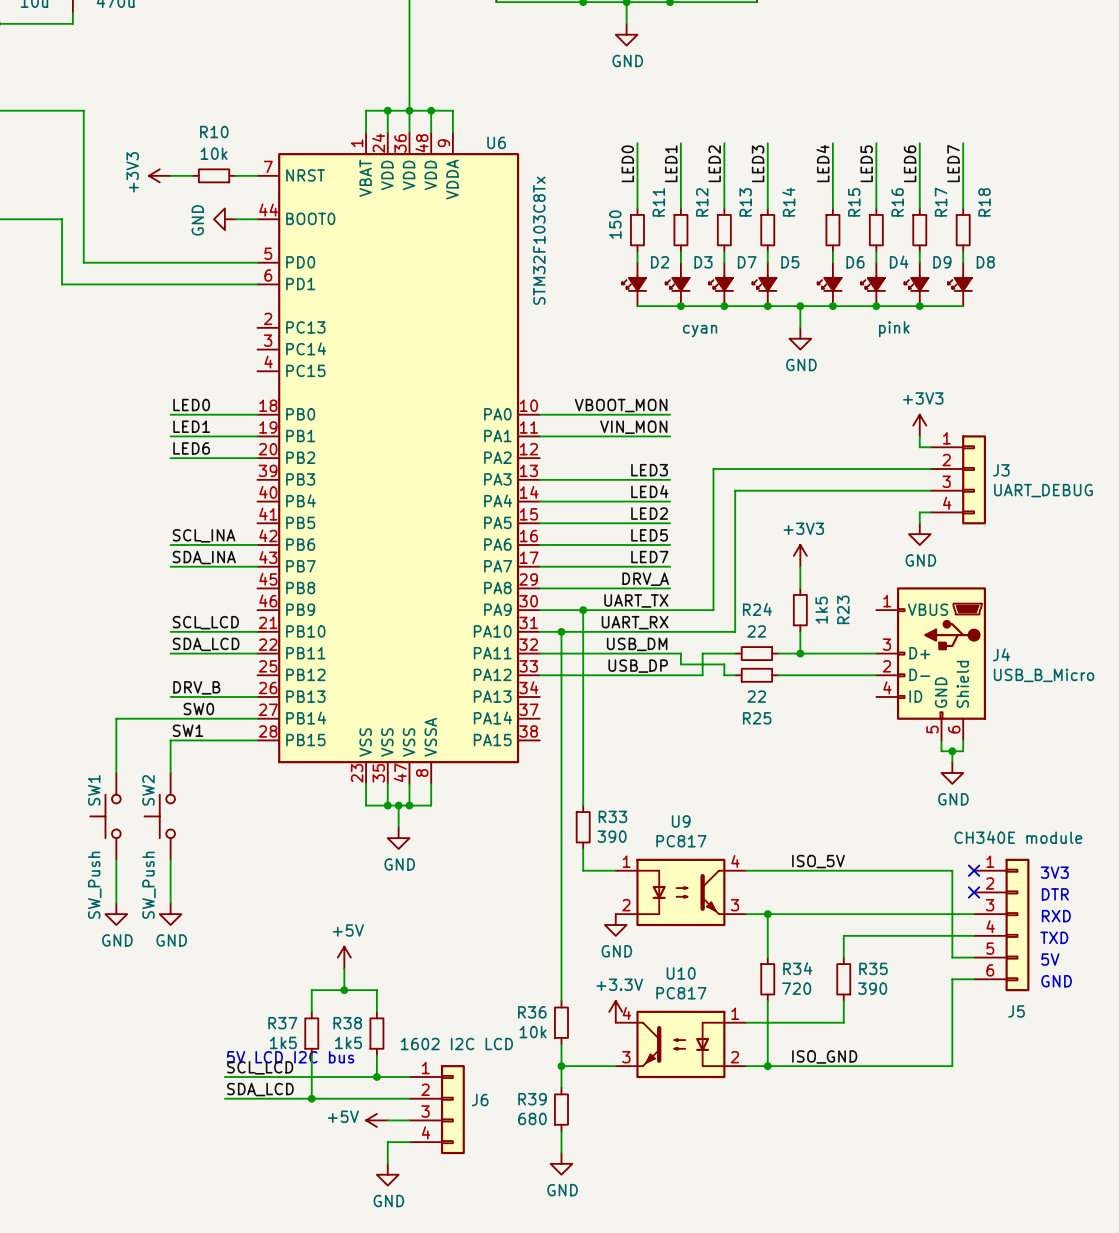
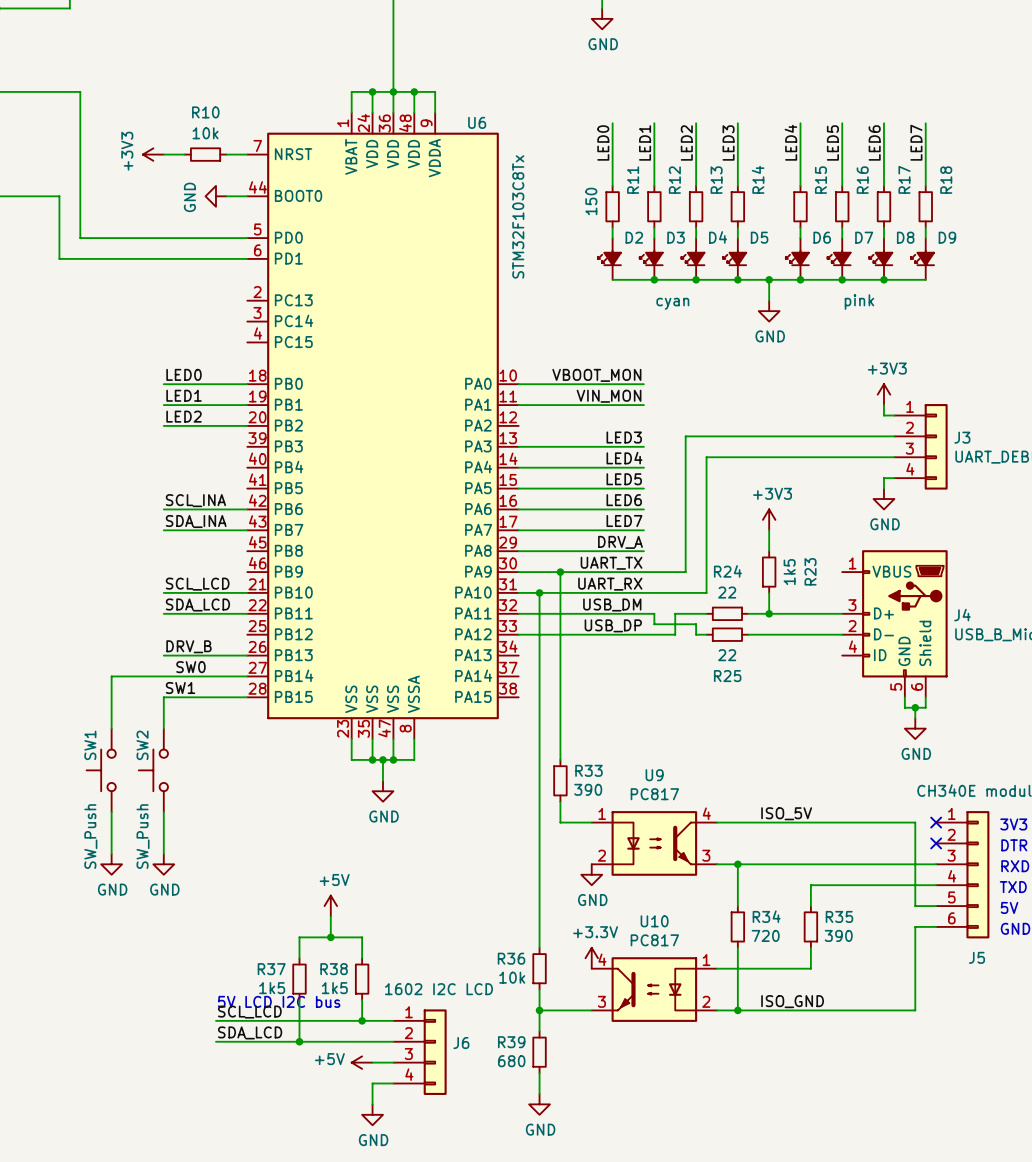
D7 name: D7 (747, 262) -> D4 (718, 237)
D4 name: D4 (899, 262) -> D7 (864, 237)
D9 name: D9 (942, 262) -> D8 (905, 237)
D8 name: D8 (985, 262) -> D9 (947, 237)
label: LED6 (191, 448) -> LED2 (184, 416)
label: LED2 (649, 513) -> LED5 (624, 479)
label: LED5 (649, 535) -> LED6 (624, 500)

